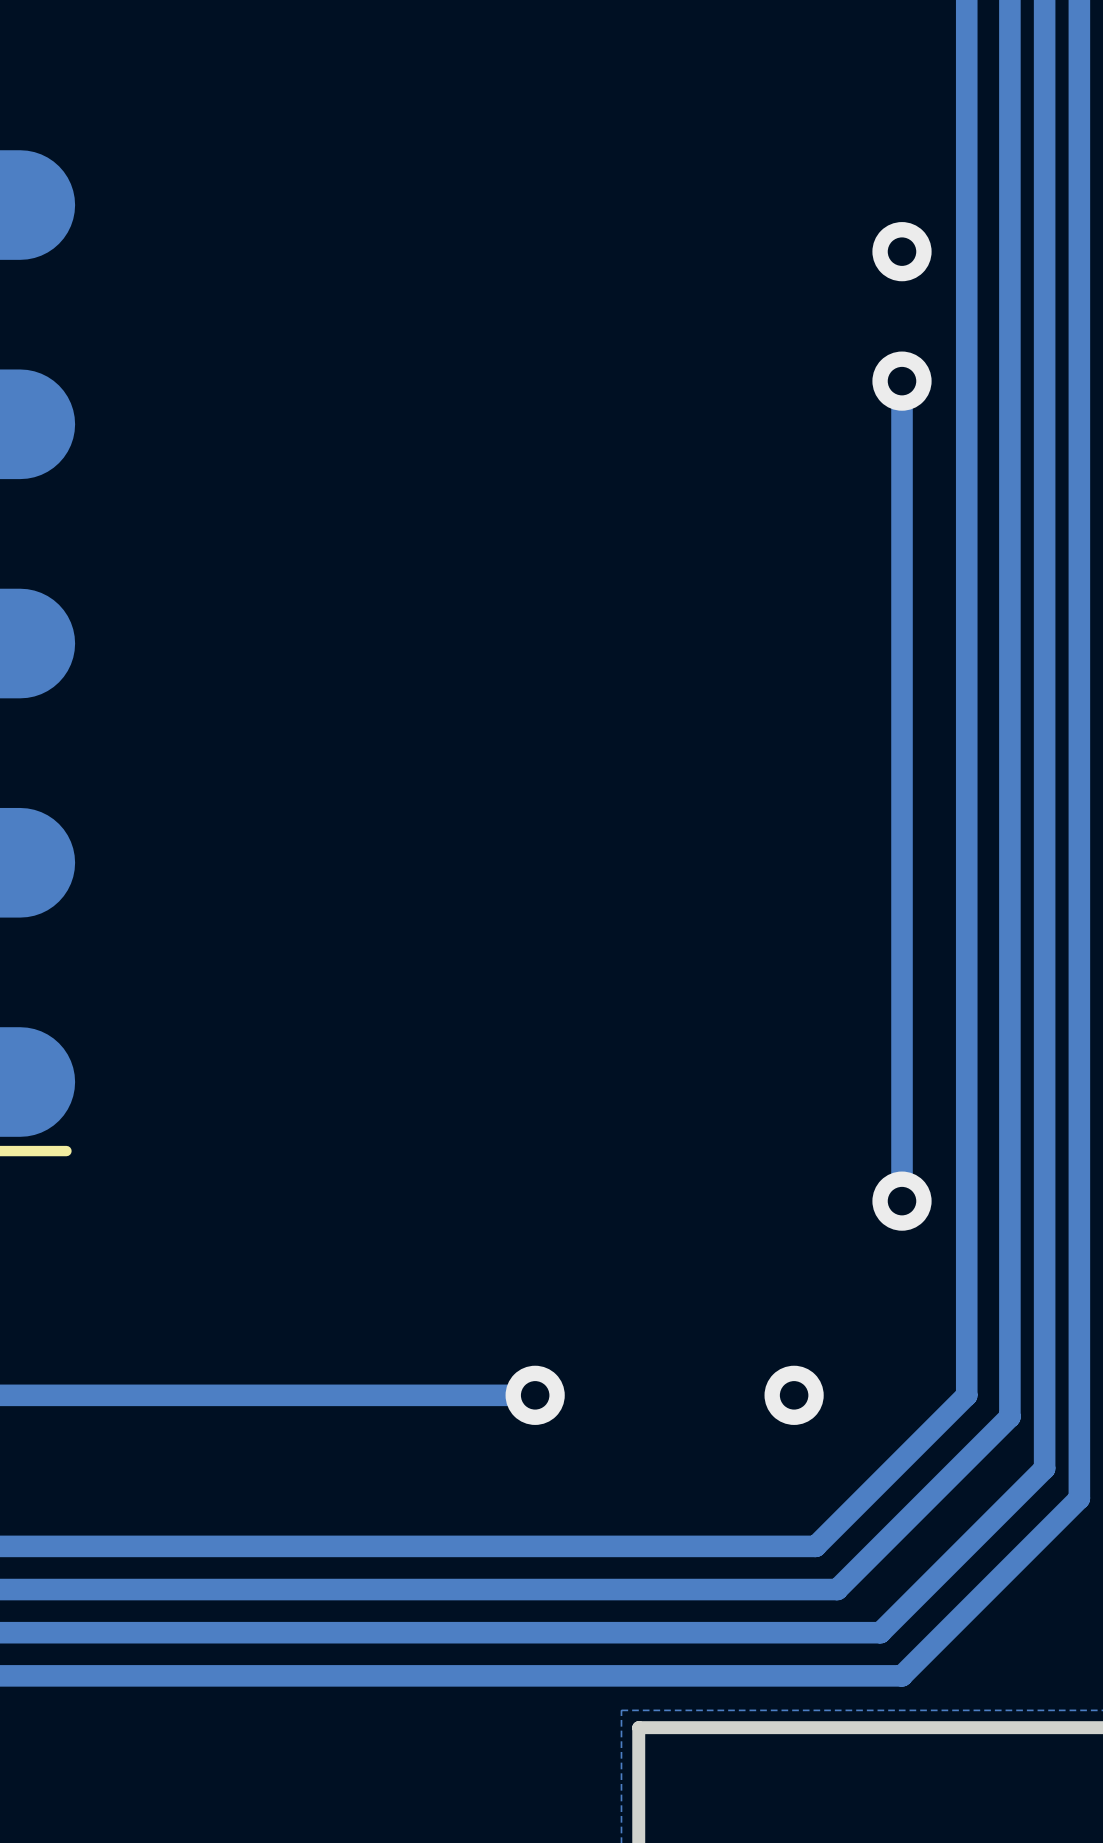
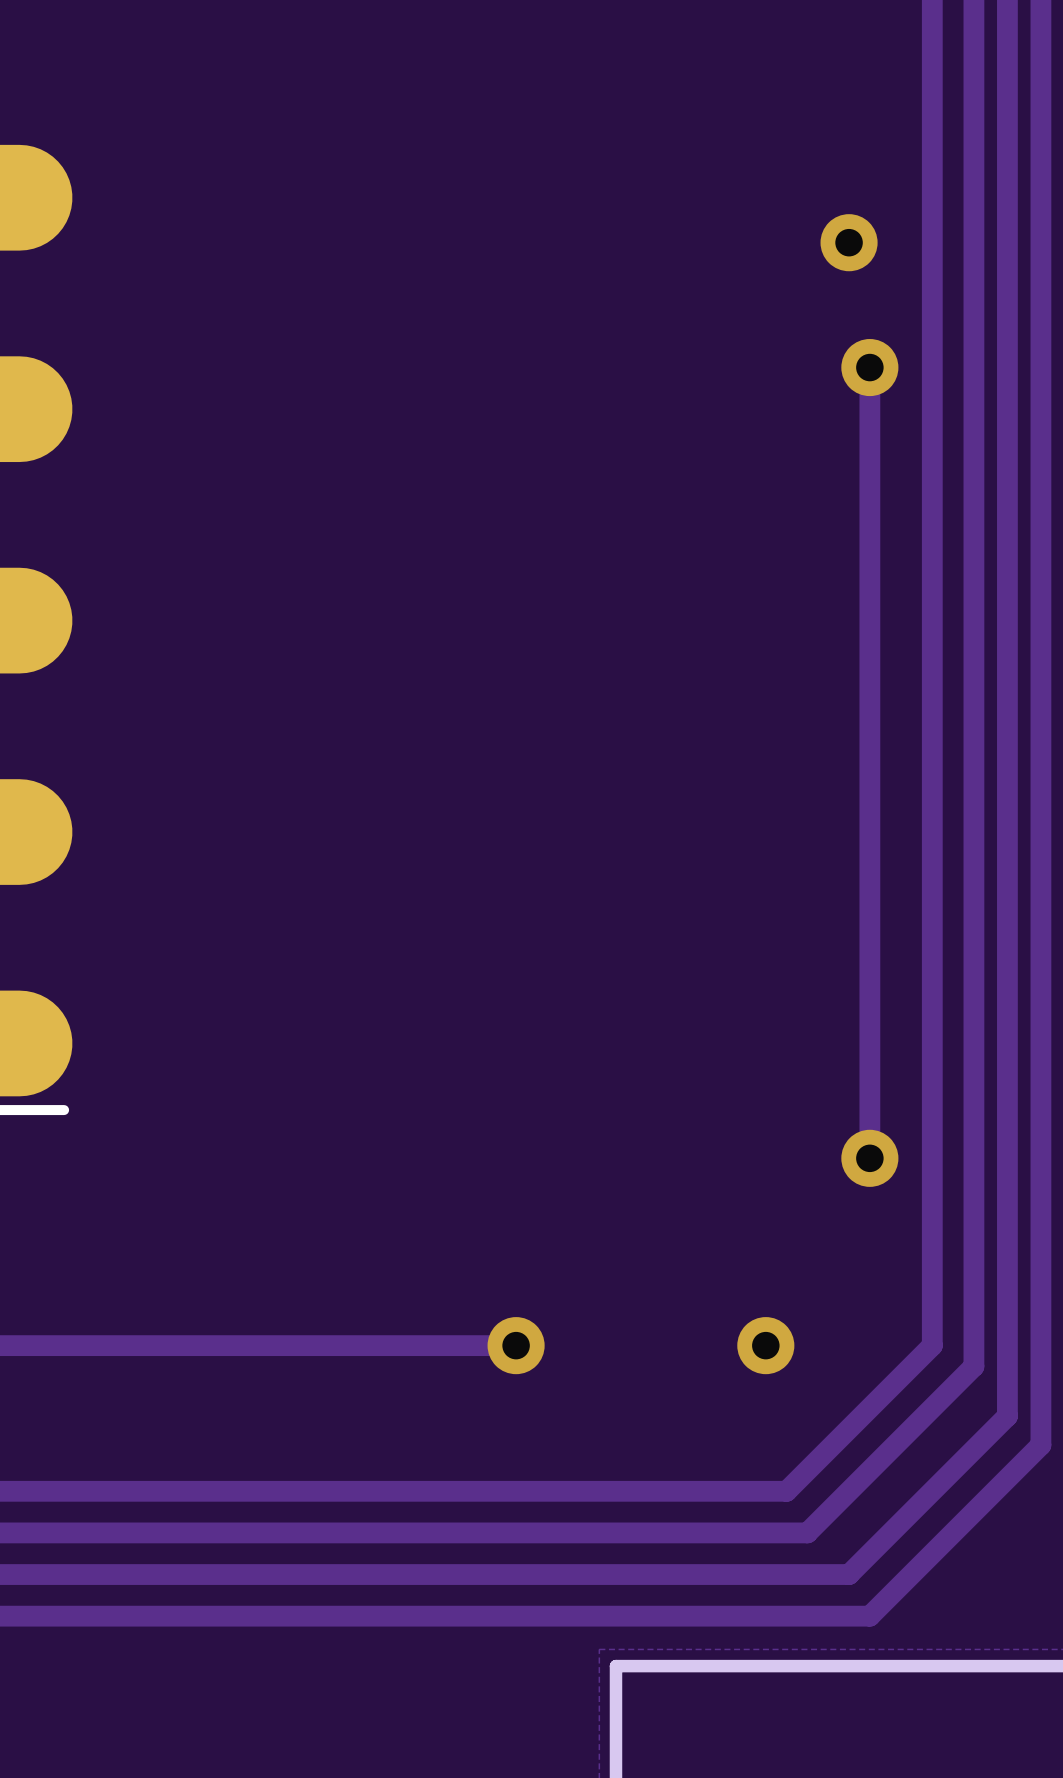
via position: (902, 251) -> (849, 242)

